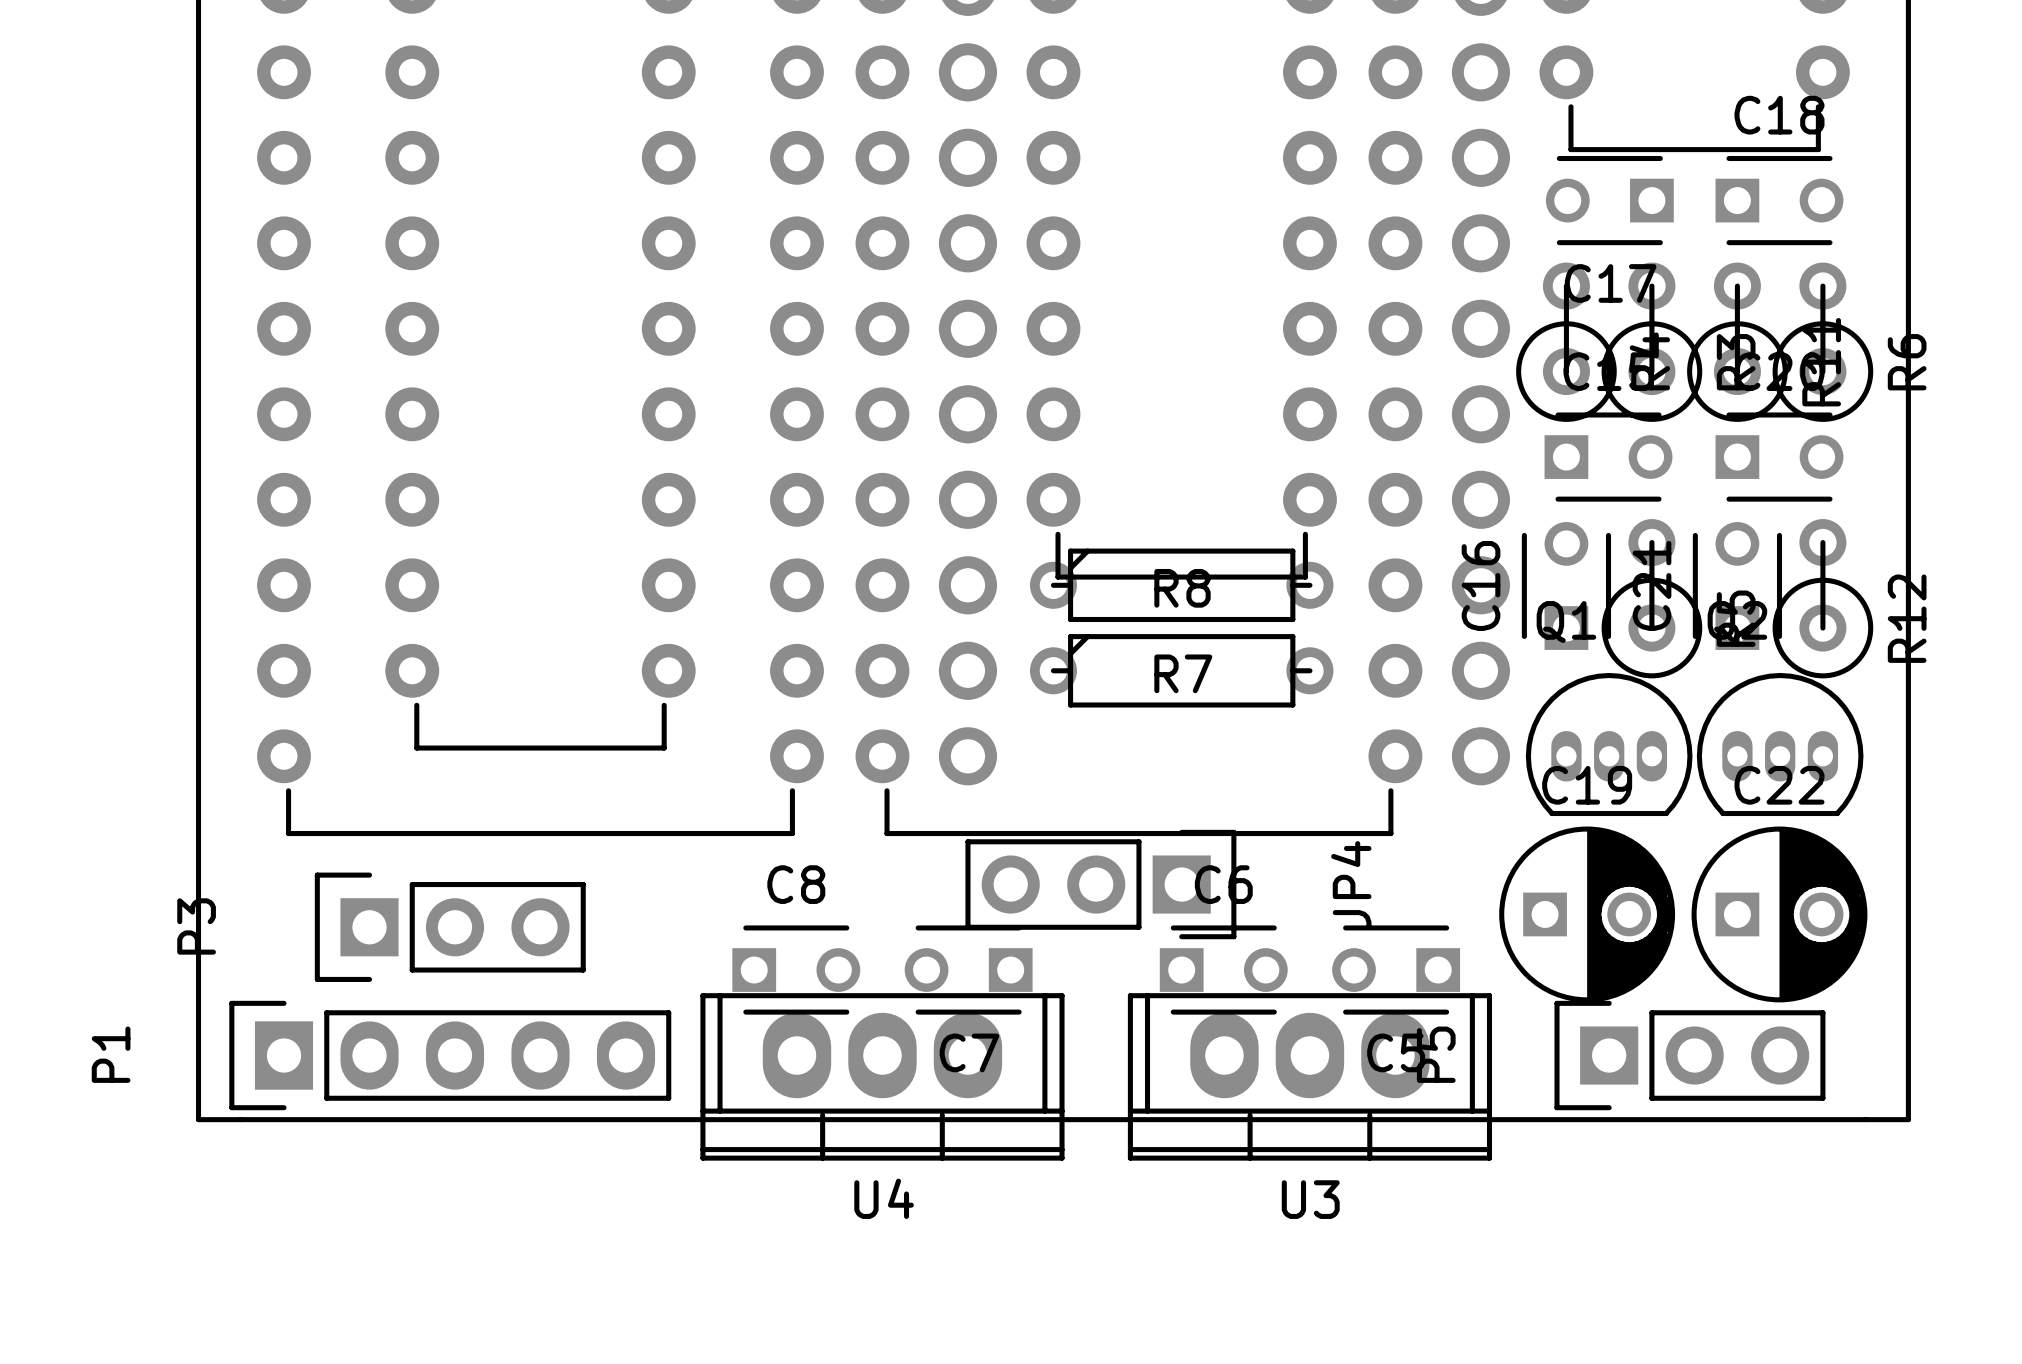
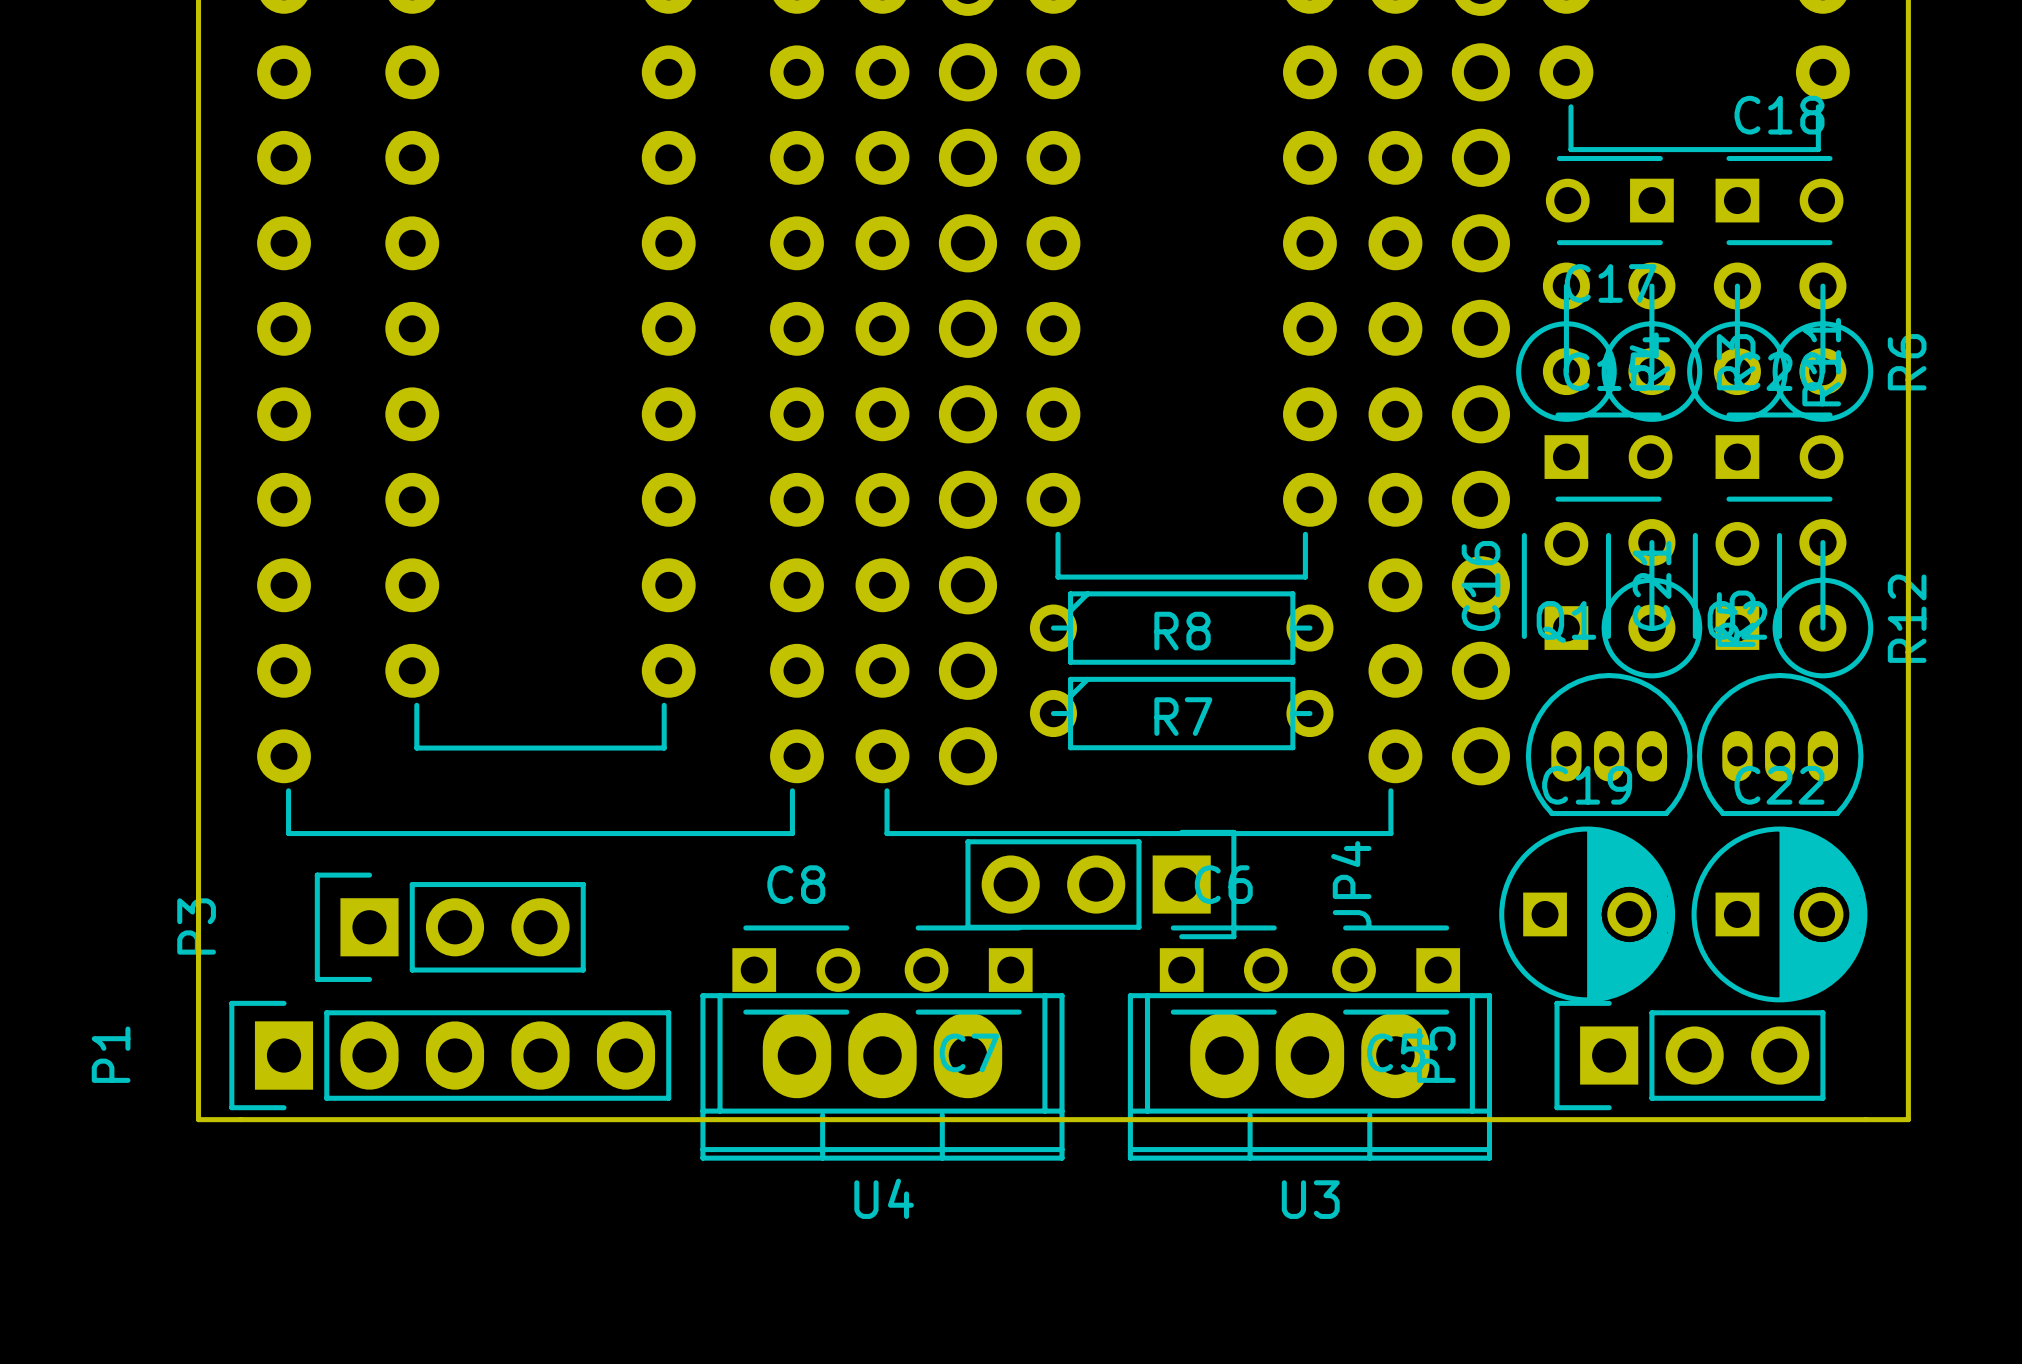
R8 position: (1181, 585) -> (1181, 628)
R7 position: (1181, 670) -> (1181, 713)

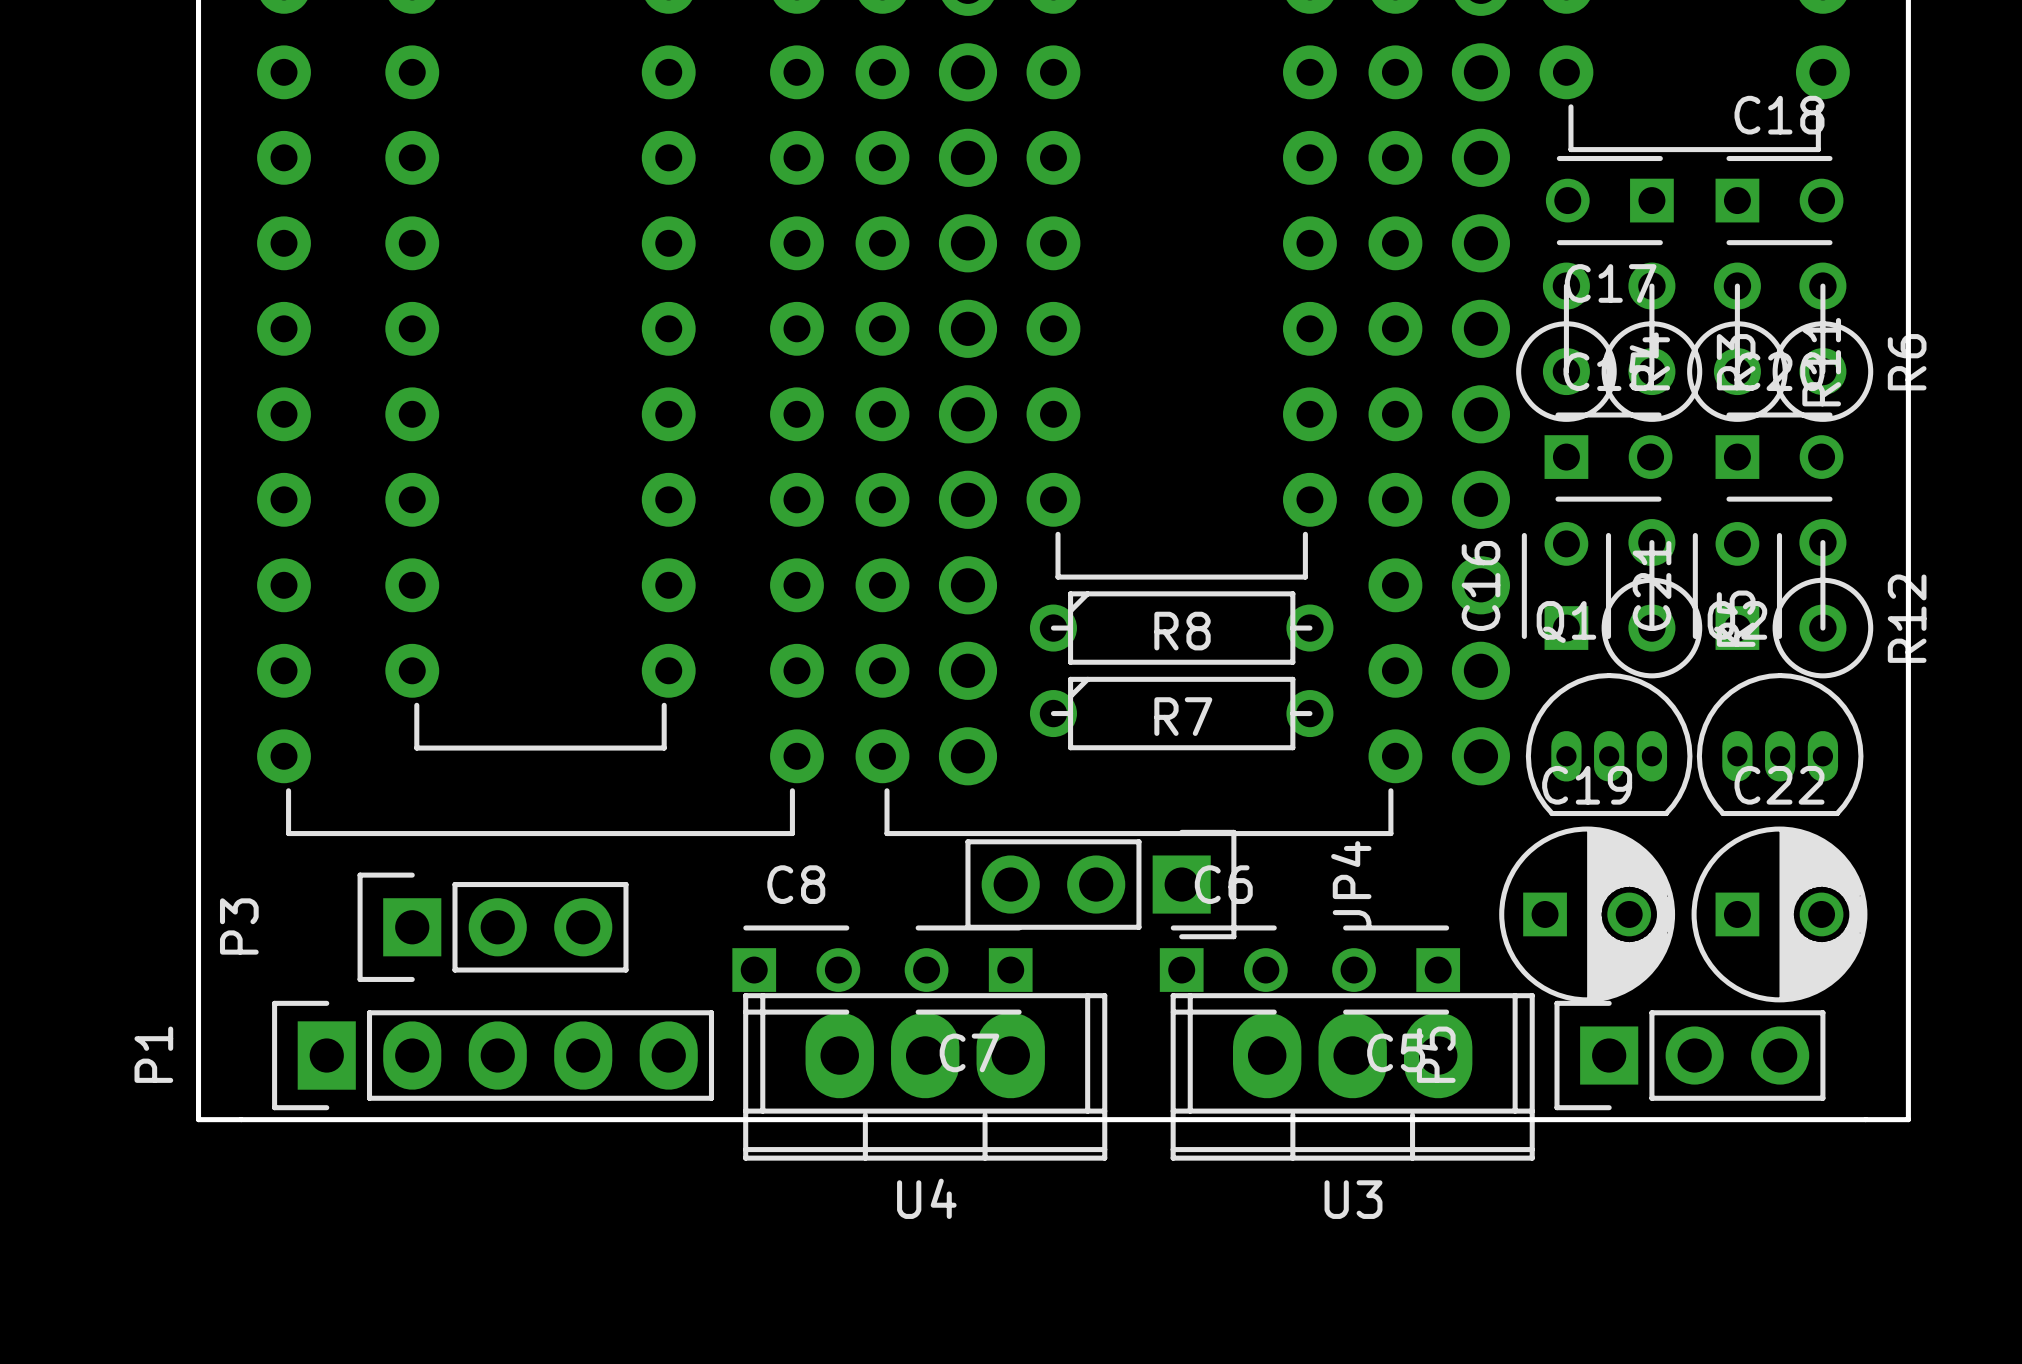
P3 position: (450, 927) -> (493, 927)
P1 position: (450, 1055) -> (493, 1055)
U4 position: (882, 1076) -> (925, 1076)
U3 position: (1309, 1076) -> (1352, 1076)

